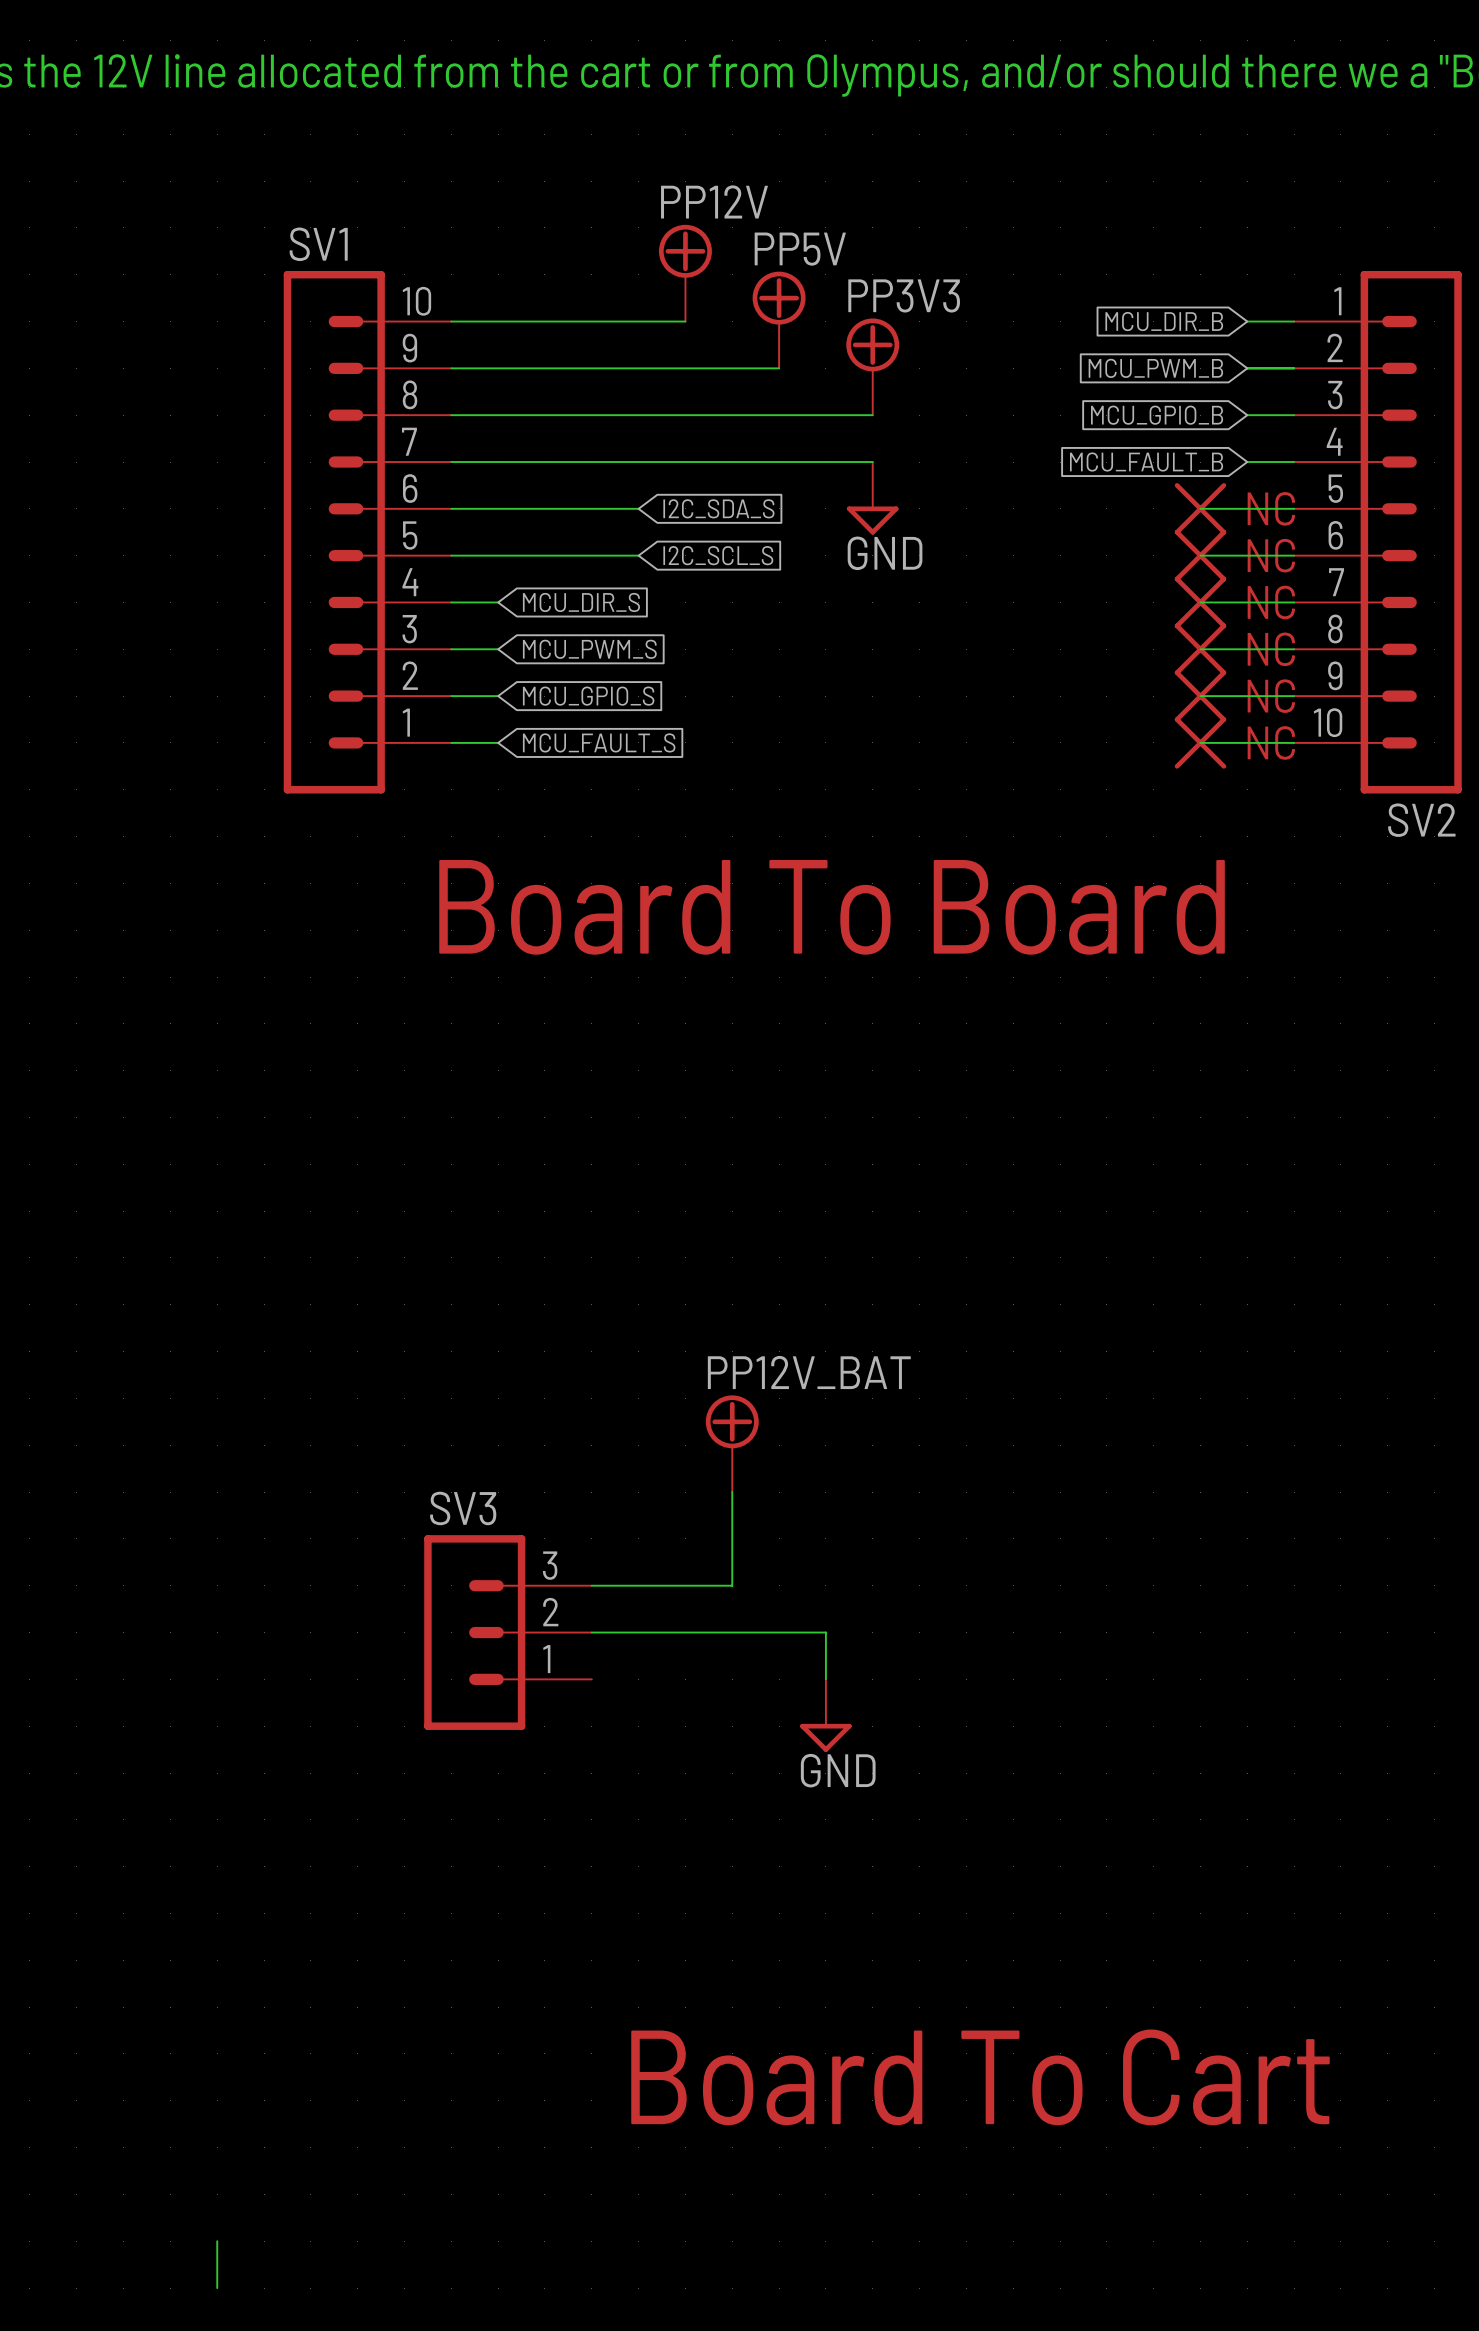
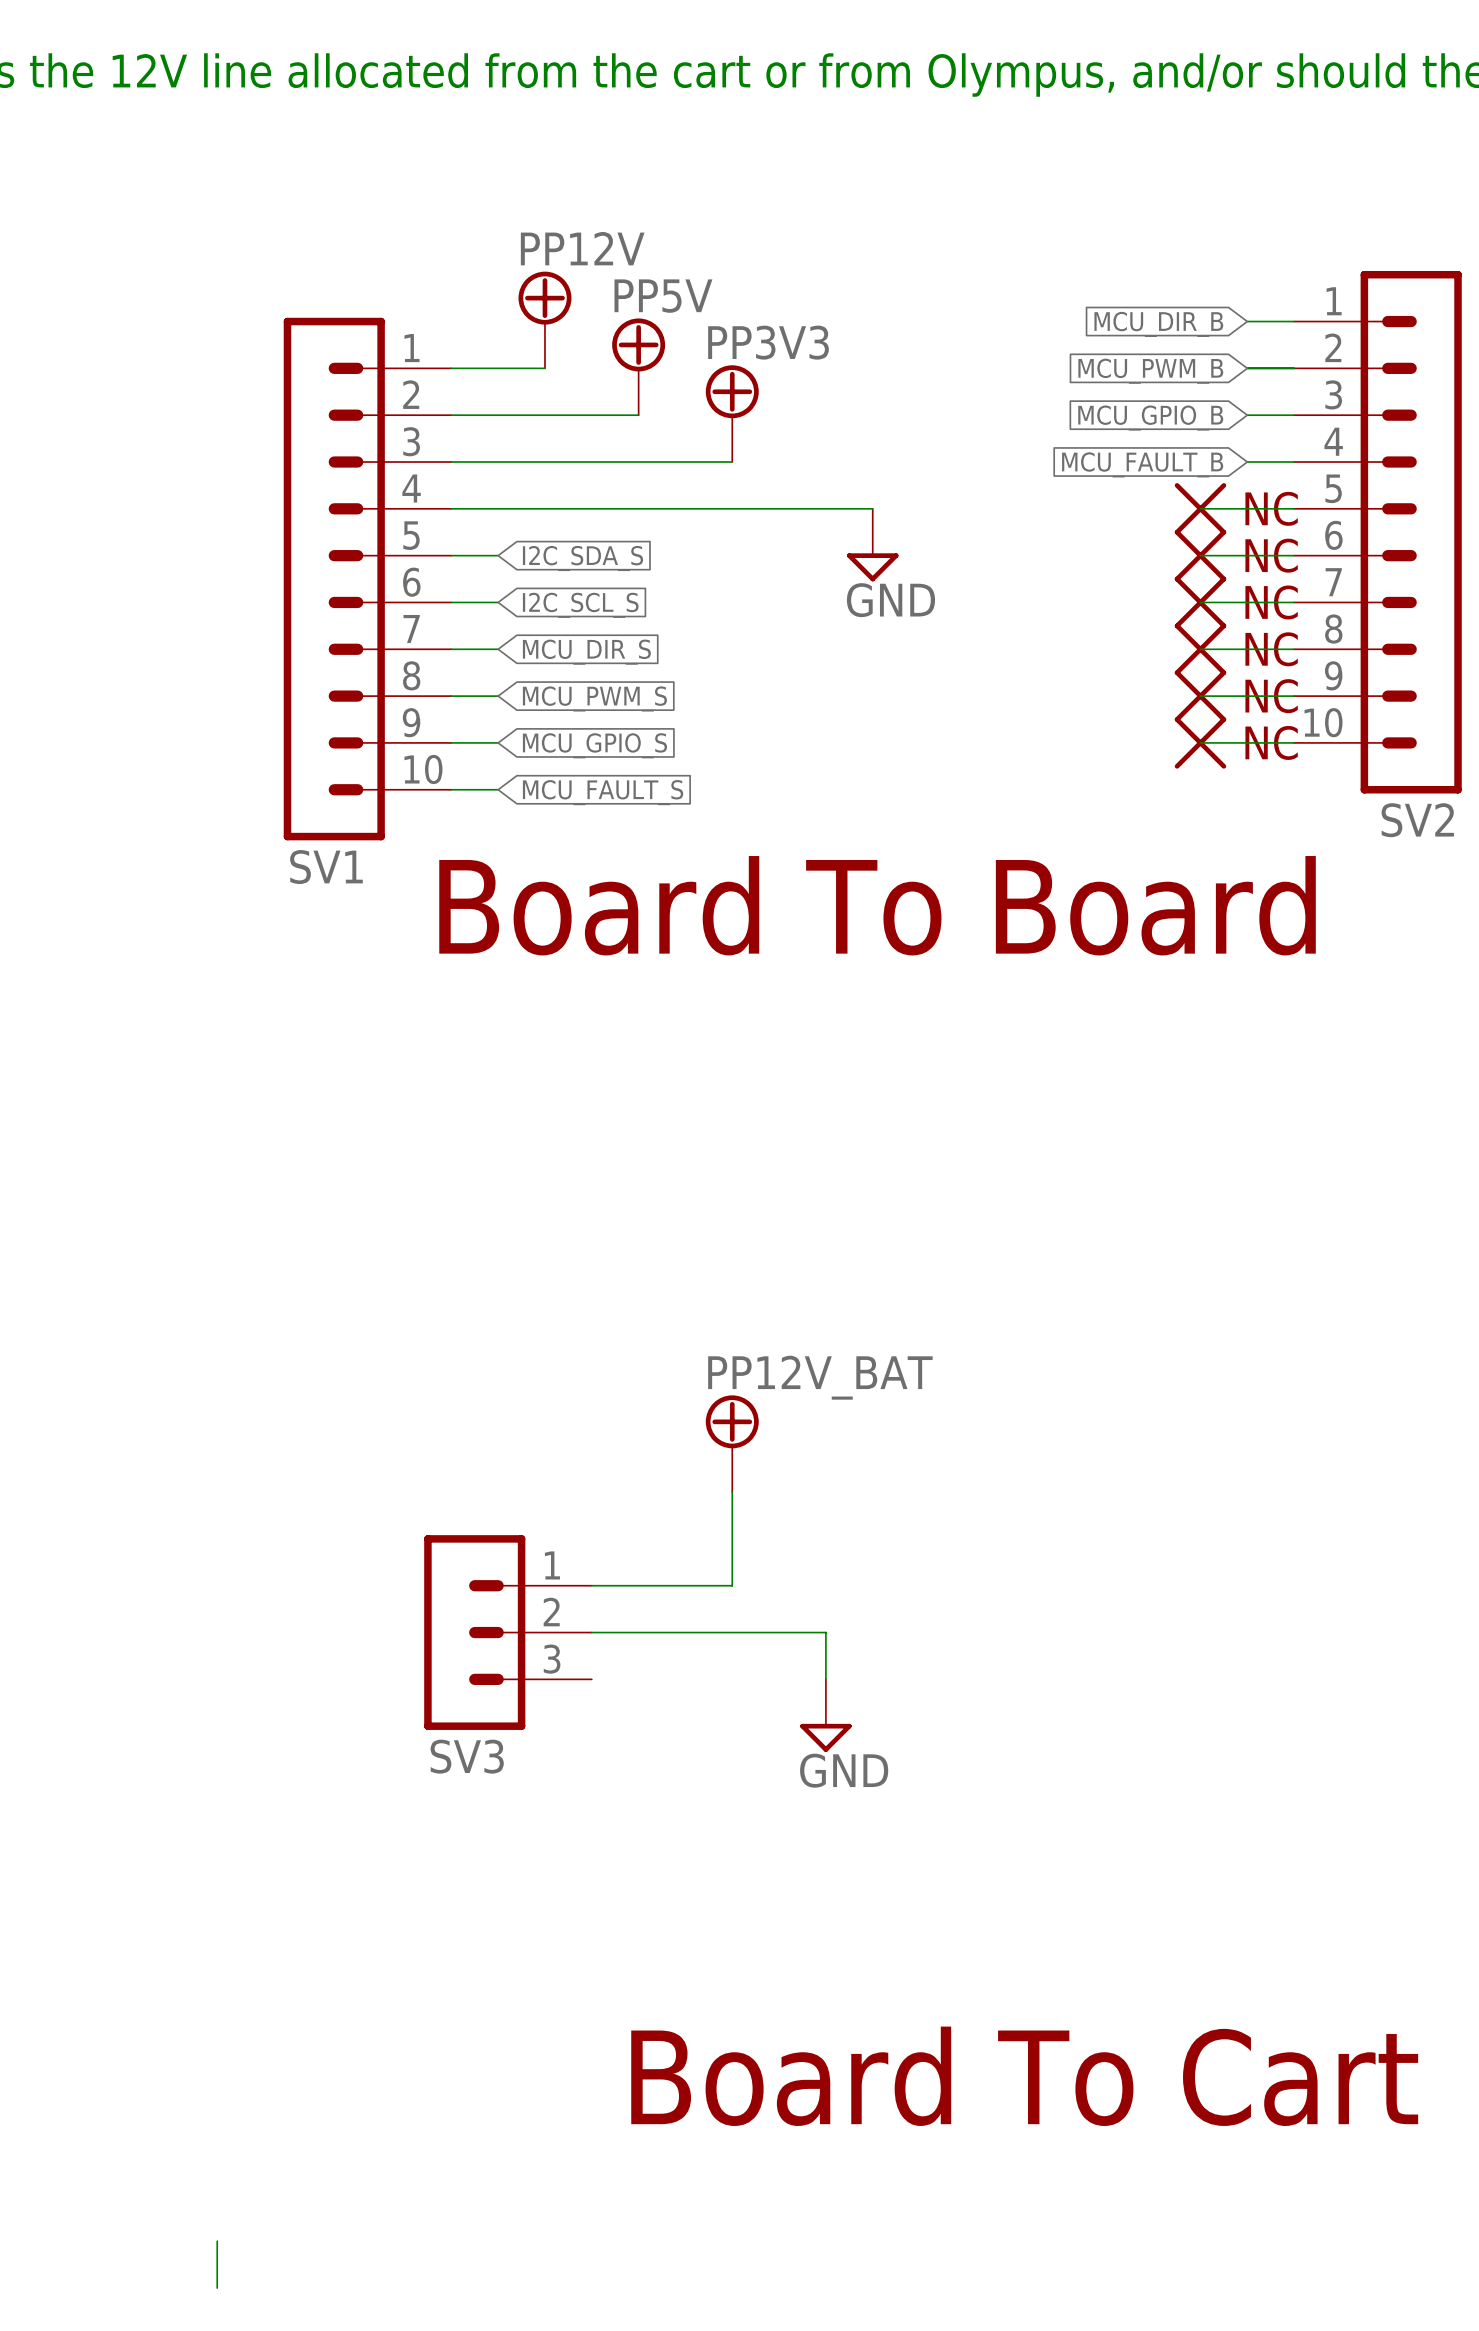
power symbol position: PP12V (685, 273) -> PP12V (544, 320)
power symbol position: PP5V (779, 320) -> PP5V (638, 366)
wire: (451, 321) (685, 321) -> none
power symbol position: PP3V3 (872, 366) -> PP3V3 (732, 413)
wire: (544, 368) (779, 368) -> none
wire: (638, 415) (872, 415) -> (638, 508) (872, 508)
wire: (732, 462) (872, 462) -> none
power symbol position: GND (872, 498) -> GND (872, 545)
global label position: I2C_SDA_S (718, 508) -> I2C_SDA_S (583, 558)
SV1 flip: as is (334, 532) -> up-down (334, 579)
wire: (498, 555) (638, 555) -> none
global label: I2C_SCL_S (718, 555) -> none
global label: MCU_DIR_S (581, 602) -> I2C_SCL_S (580, 605)
global label: MCU_PWM_S (589, 649) -> MCU_DIR_S (586, 652)
global label: MCU_GPIO_S (588, 696) -> MCU_PWM_S (594, 698)
global label: MCU_FAULT_S (599, 742) -> MCU_GPIO_S (594, 745)
wire: none -> (451, 789) (498, 789)
global label: none -> MCU_FAULT_S (603, 792)
SV3 flip: as is (474, 1632) -> up-down (474, 1632)

